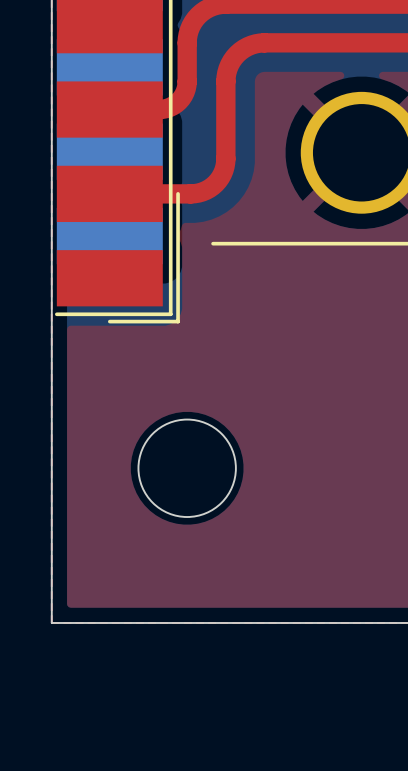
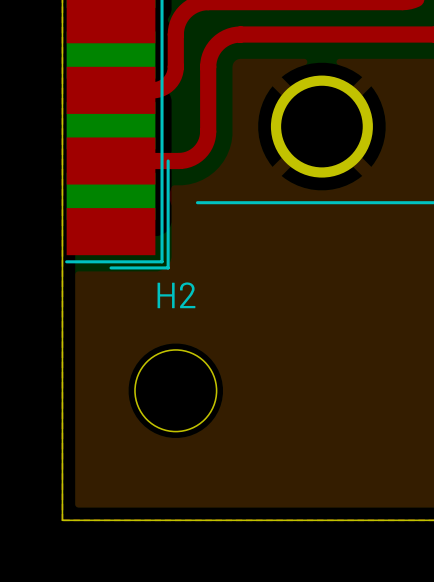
H2 name: none -> H2 (176, 295)

